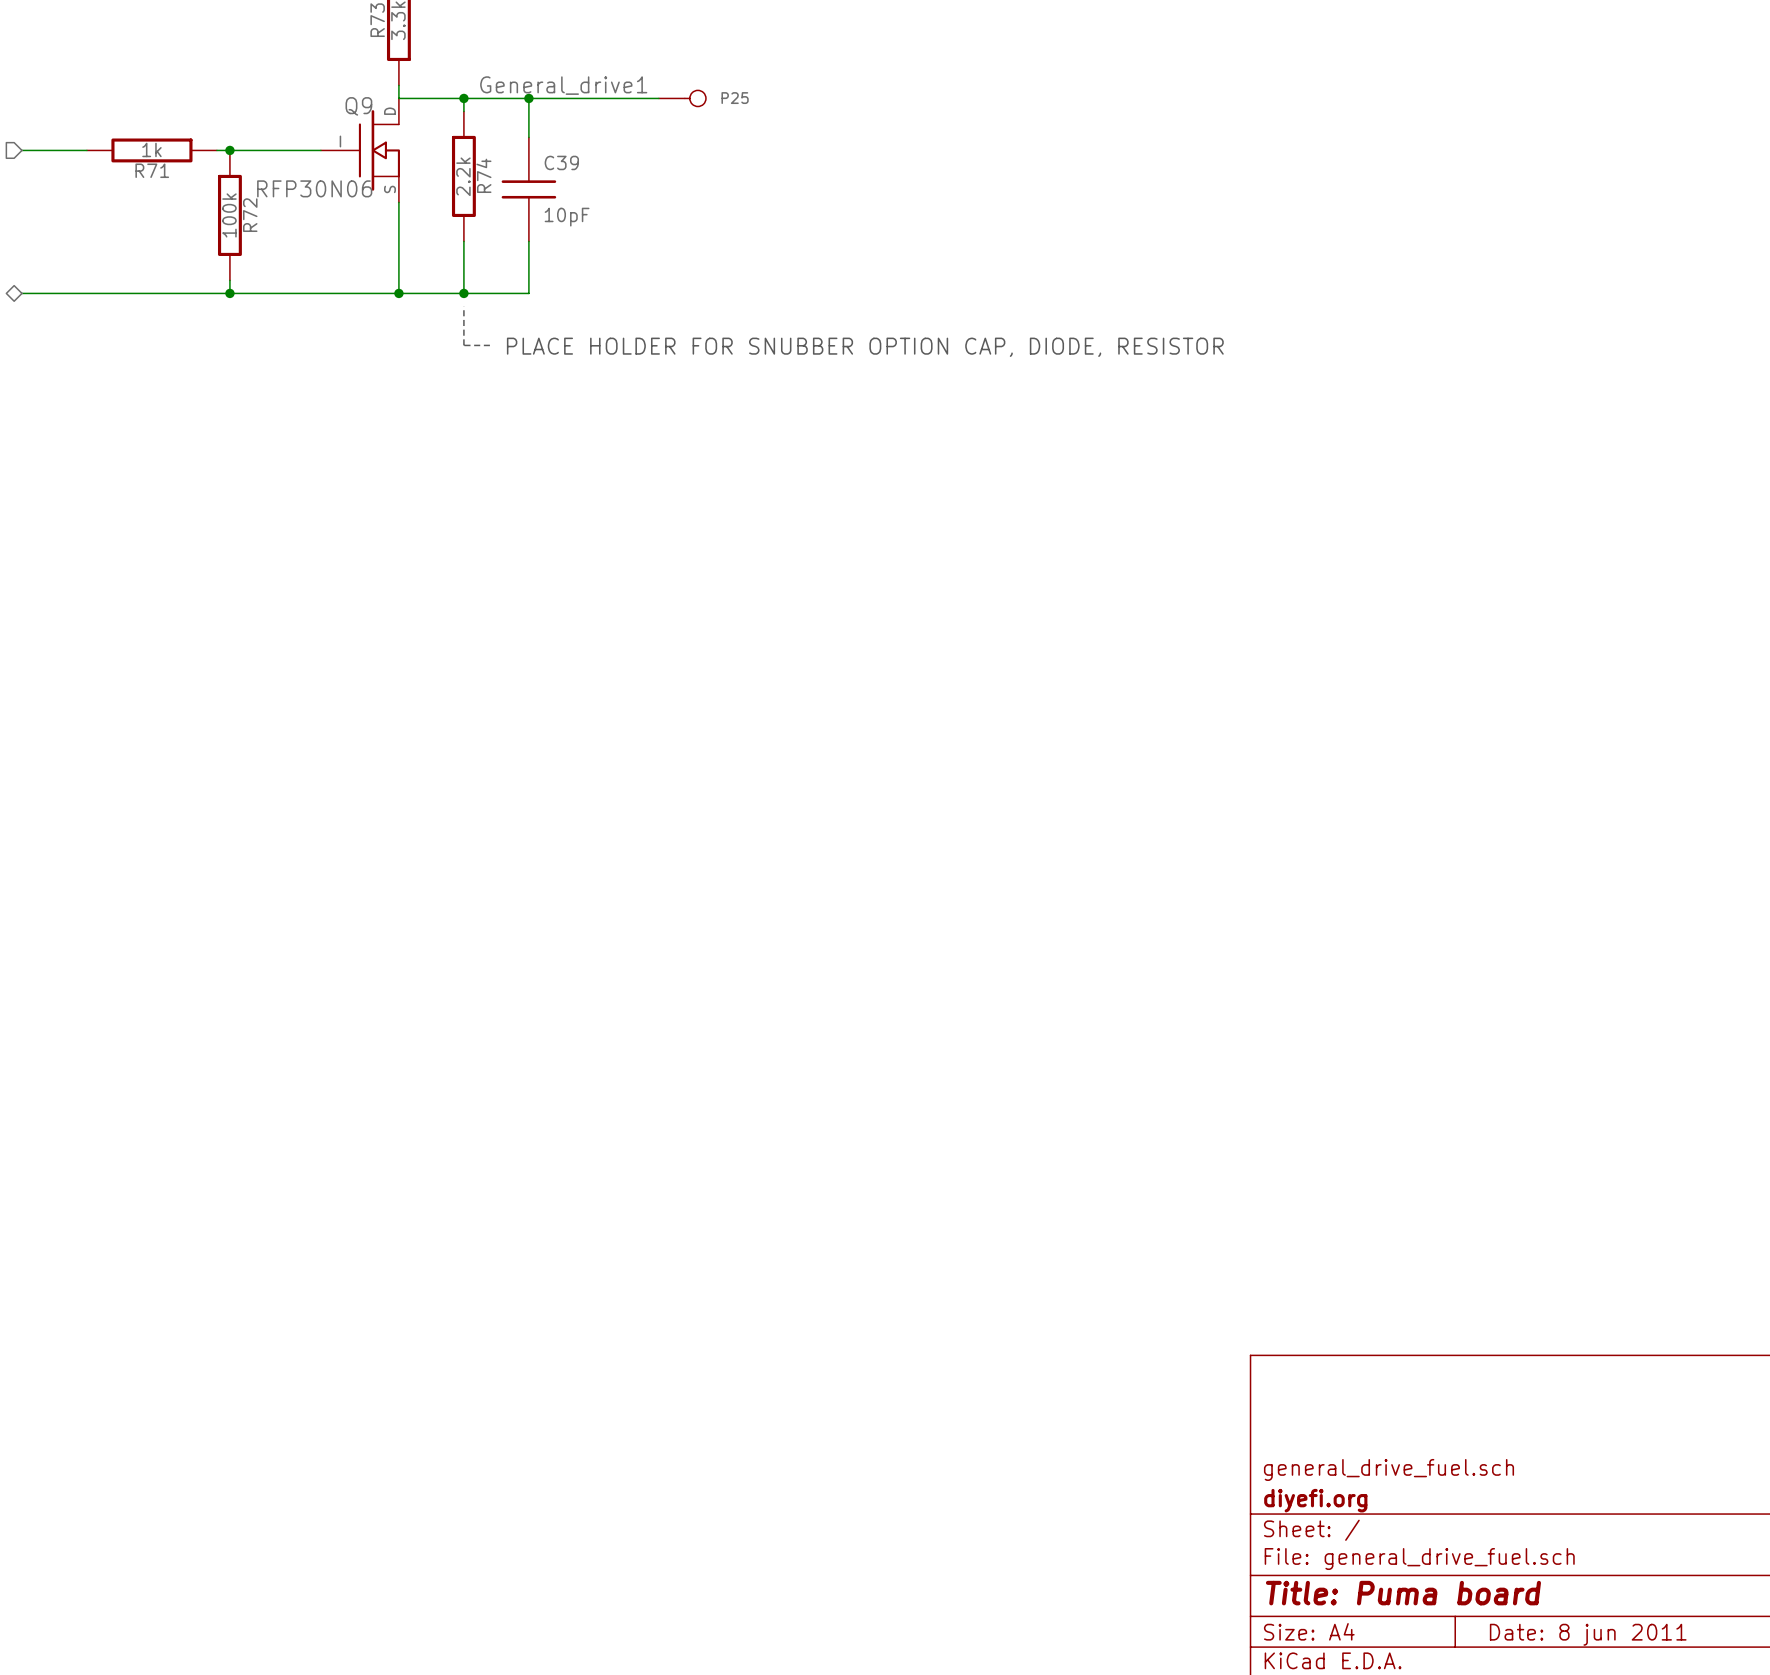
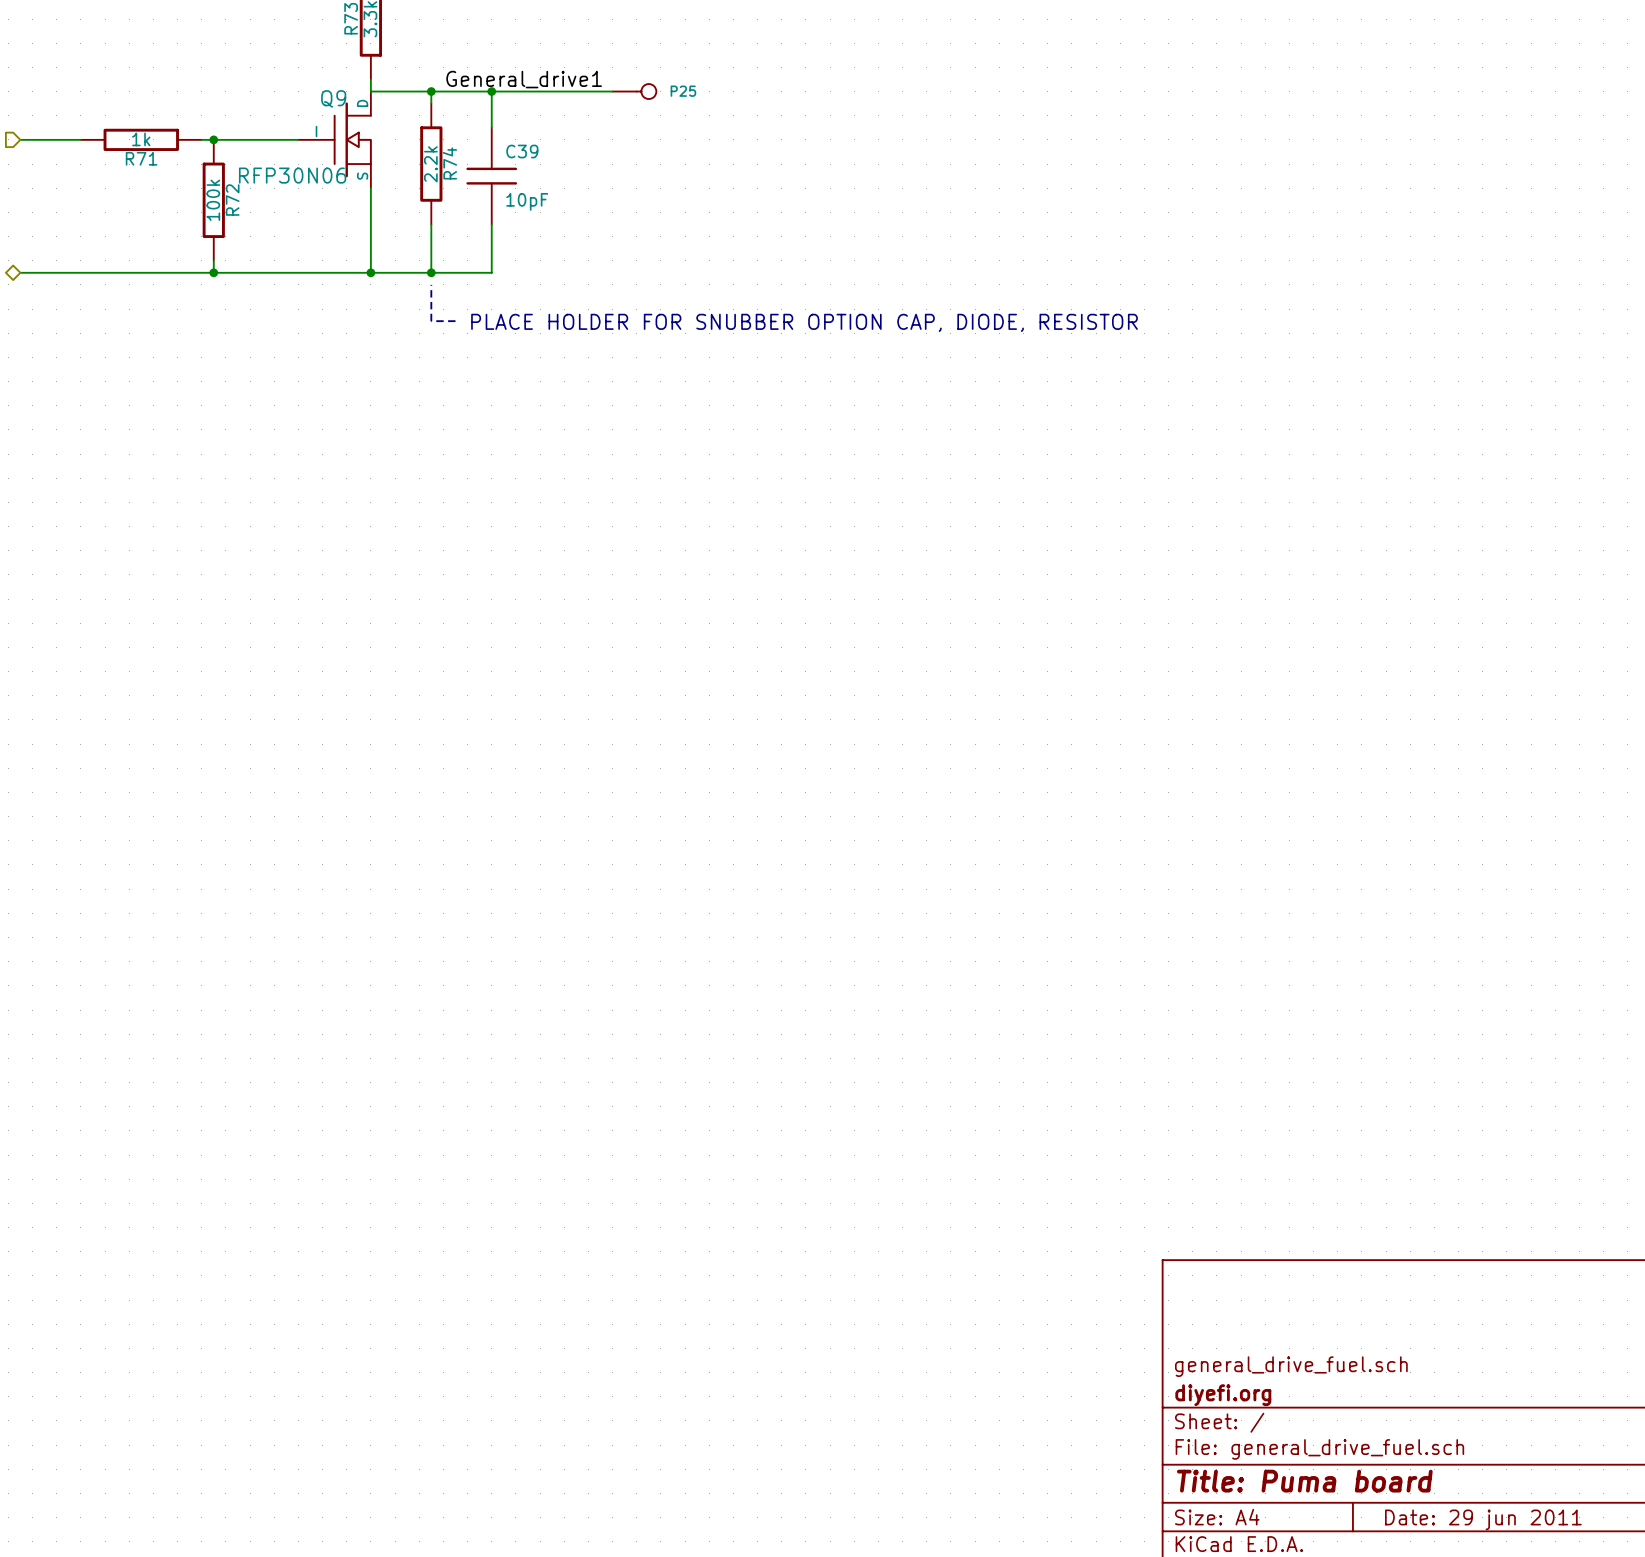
title block: Date: 8 jun 2011 (1588, 1634) -> Date: 29 jun 2011 (1483, 1519)

